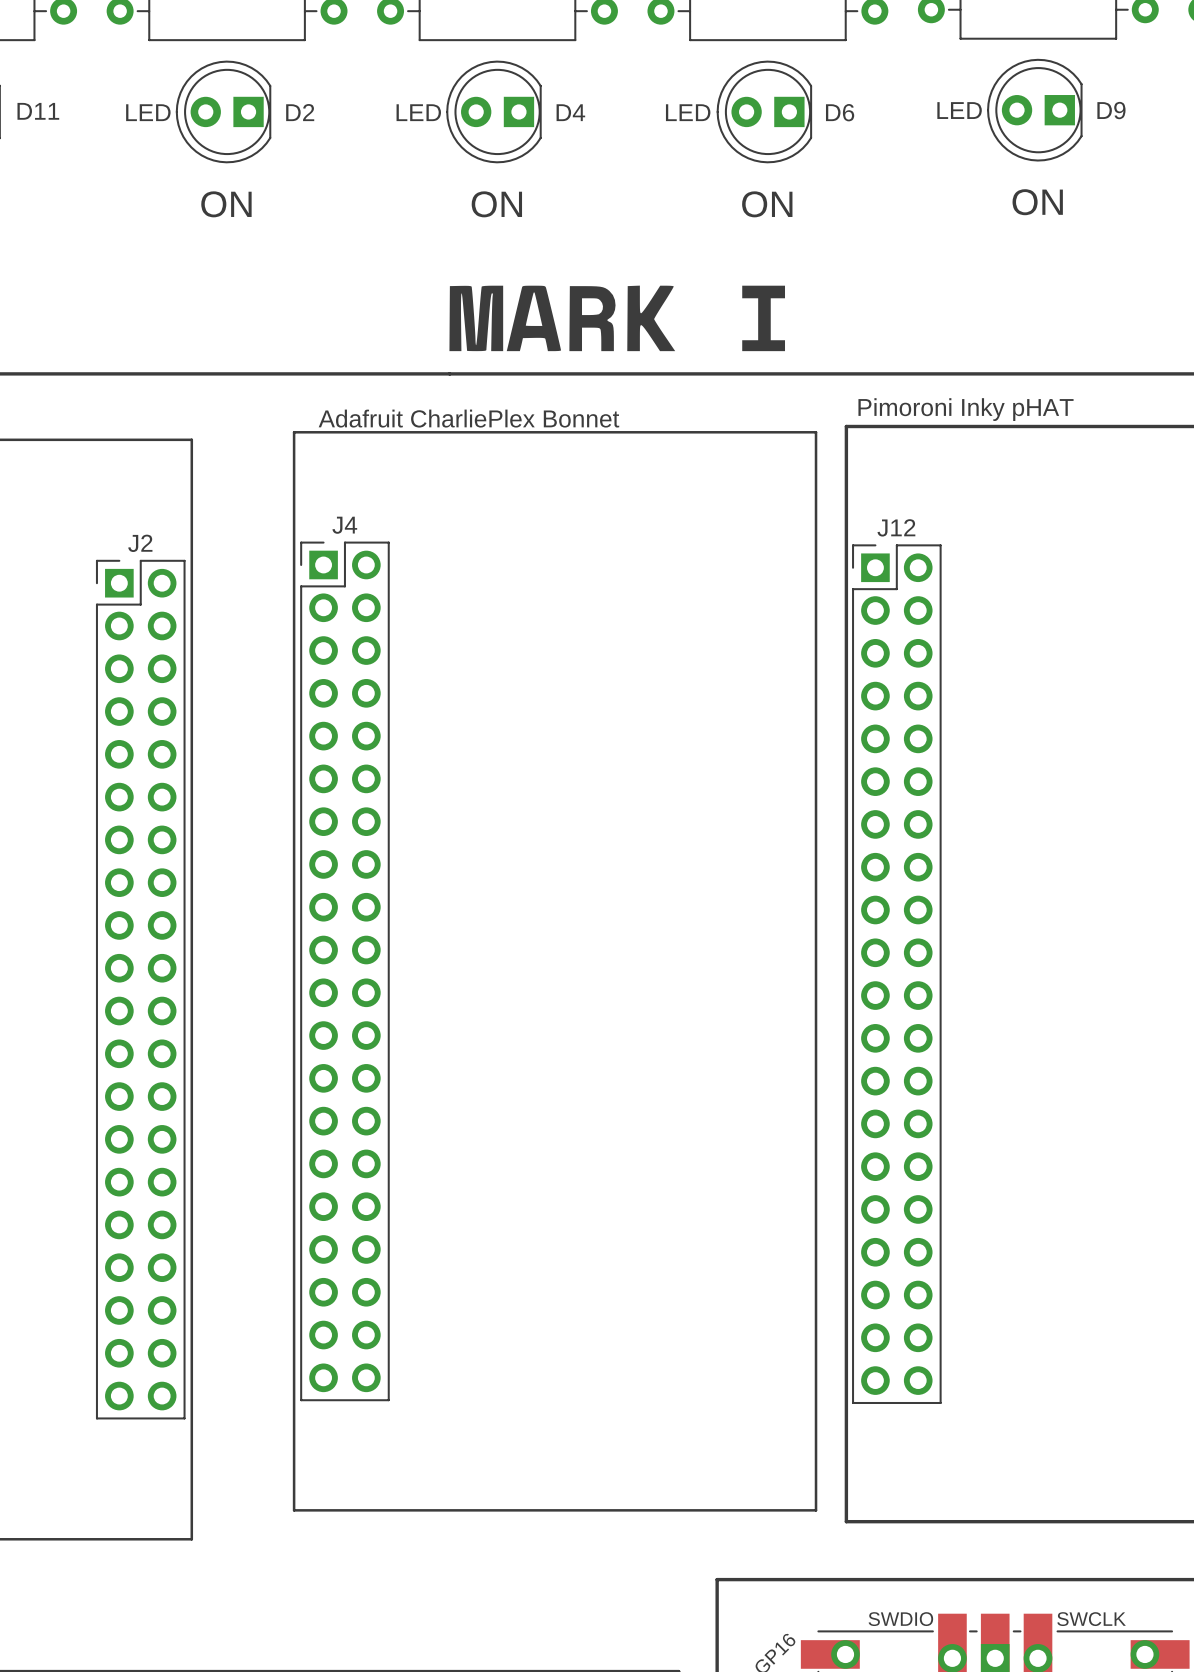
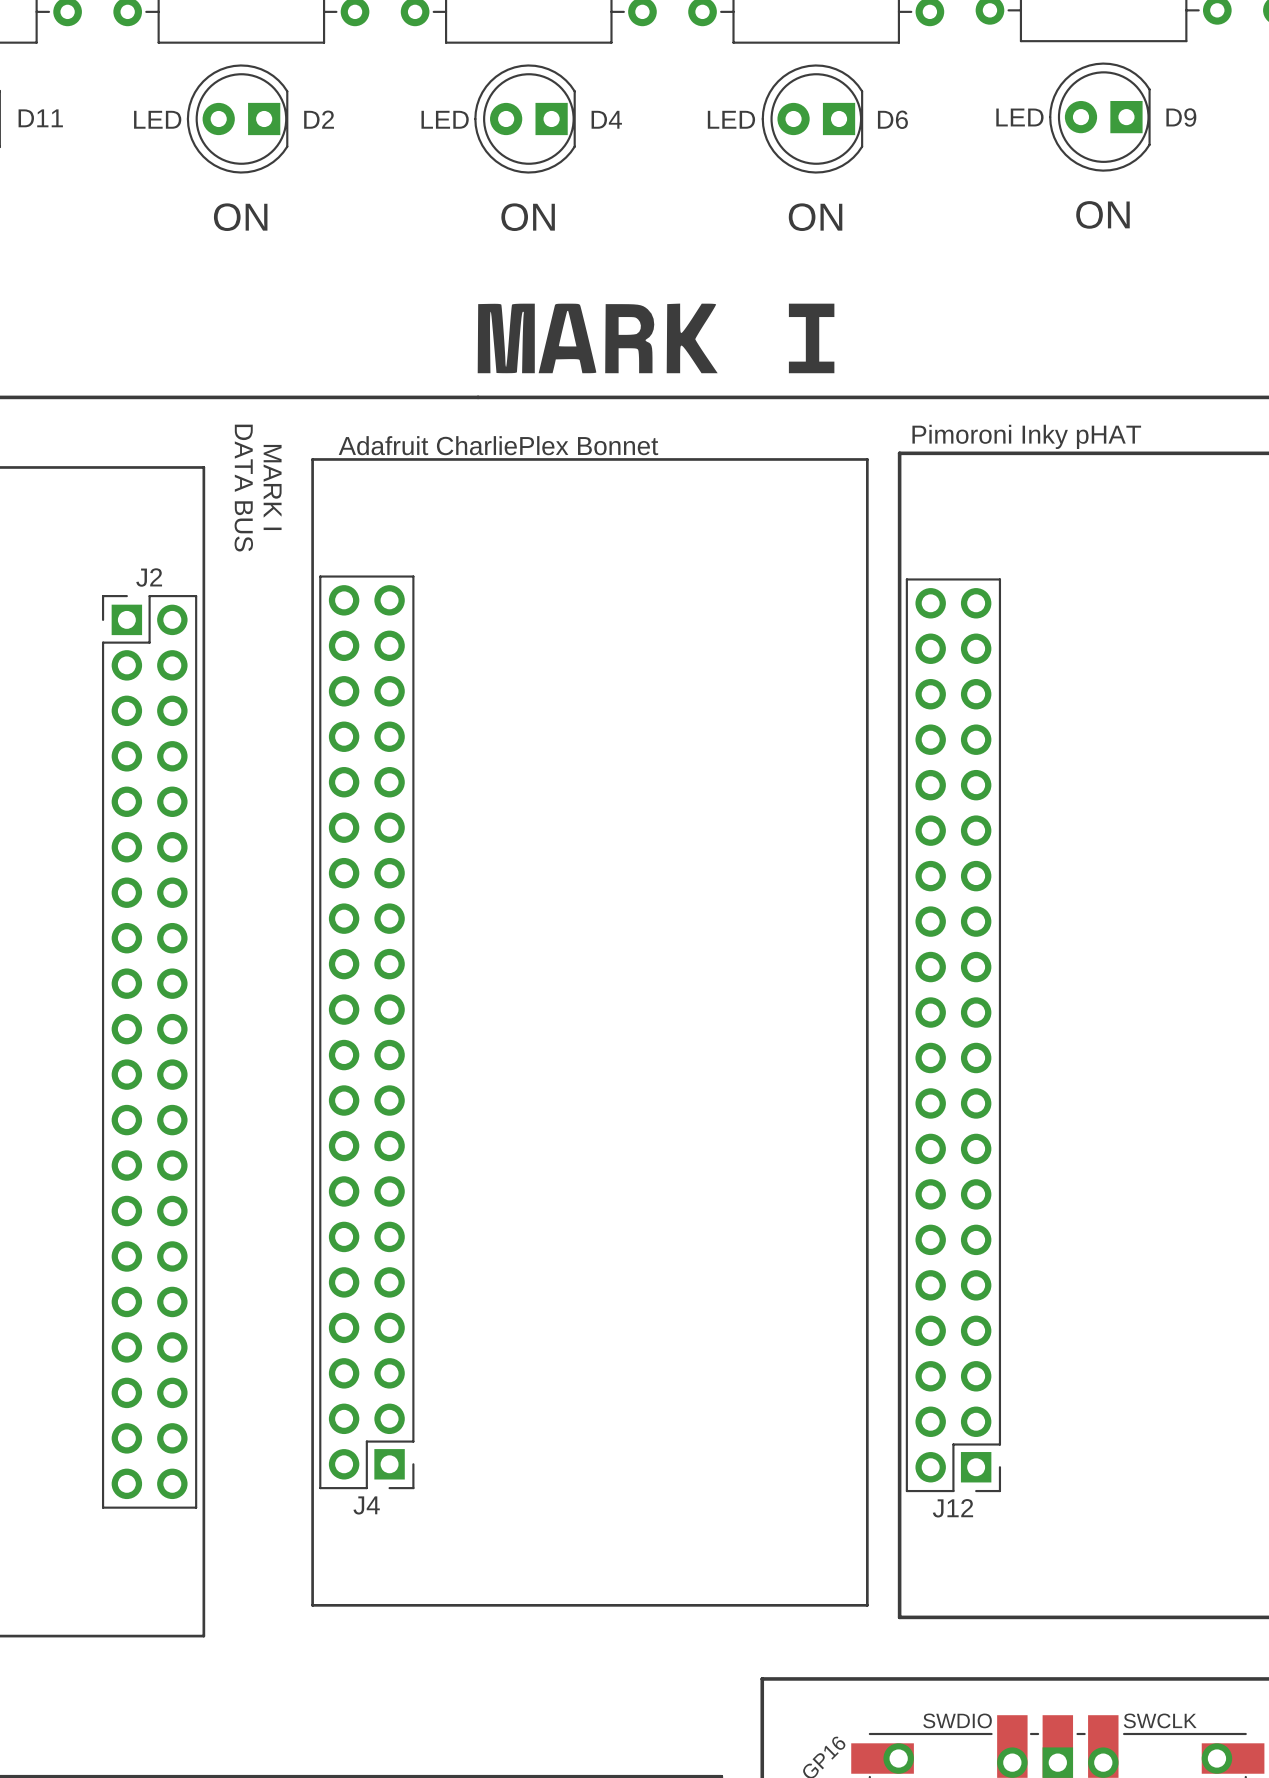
text: none -> MARK I (272, 487)
text: none -> DATA BUS (243, 488)
J4 rotation: 0° (344, 971) -> 180° (366, 1032)
J12 rotation: 0° (896, 974) -> 180° (953, 1035)

